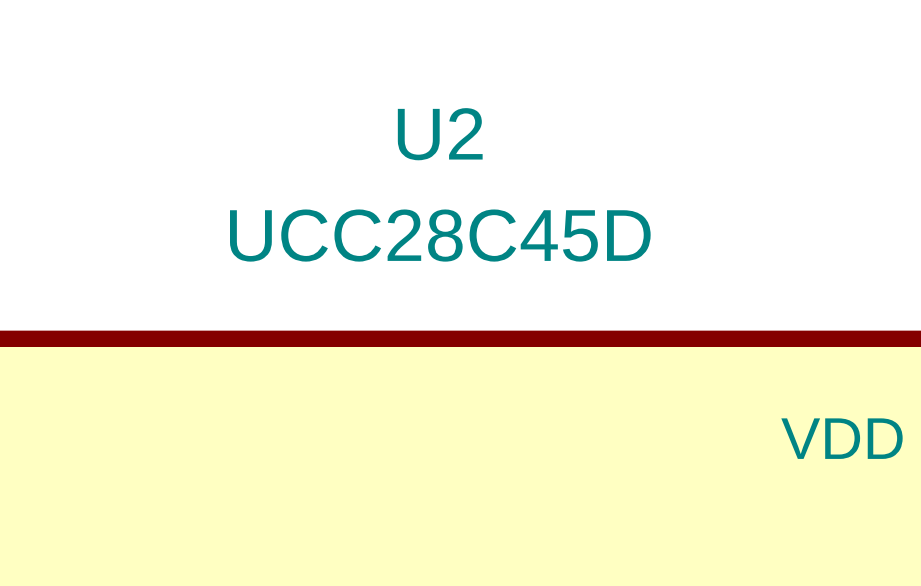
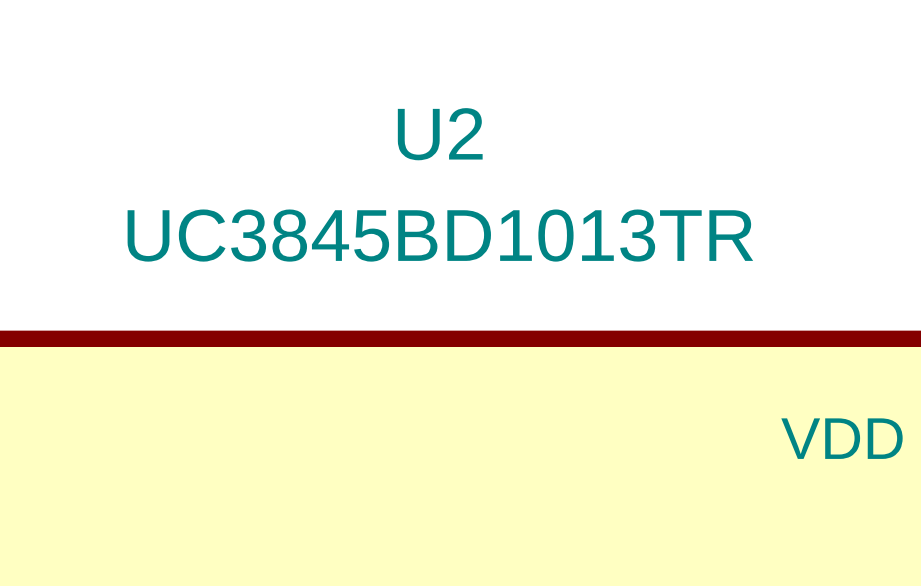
U2 value: UCC28C45D (440, 235) -> UC3845BD1013TR (440, 235)

